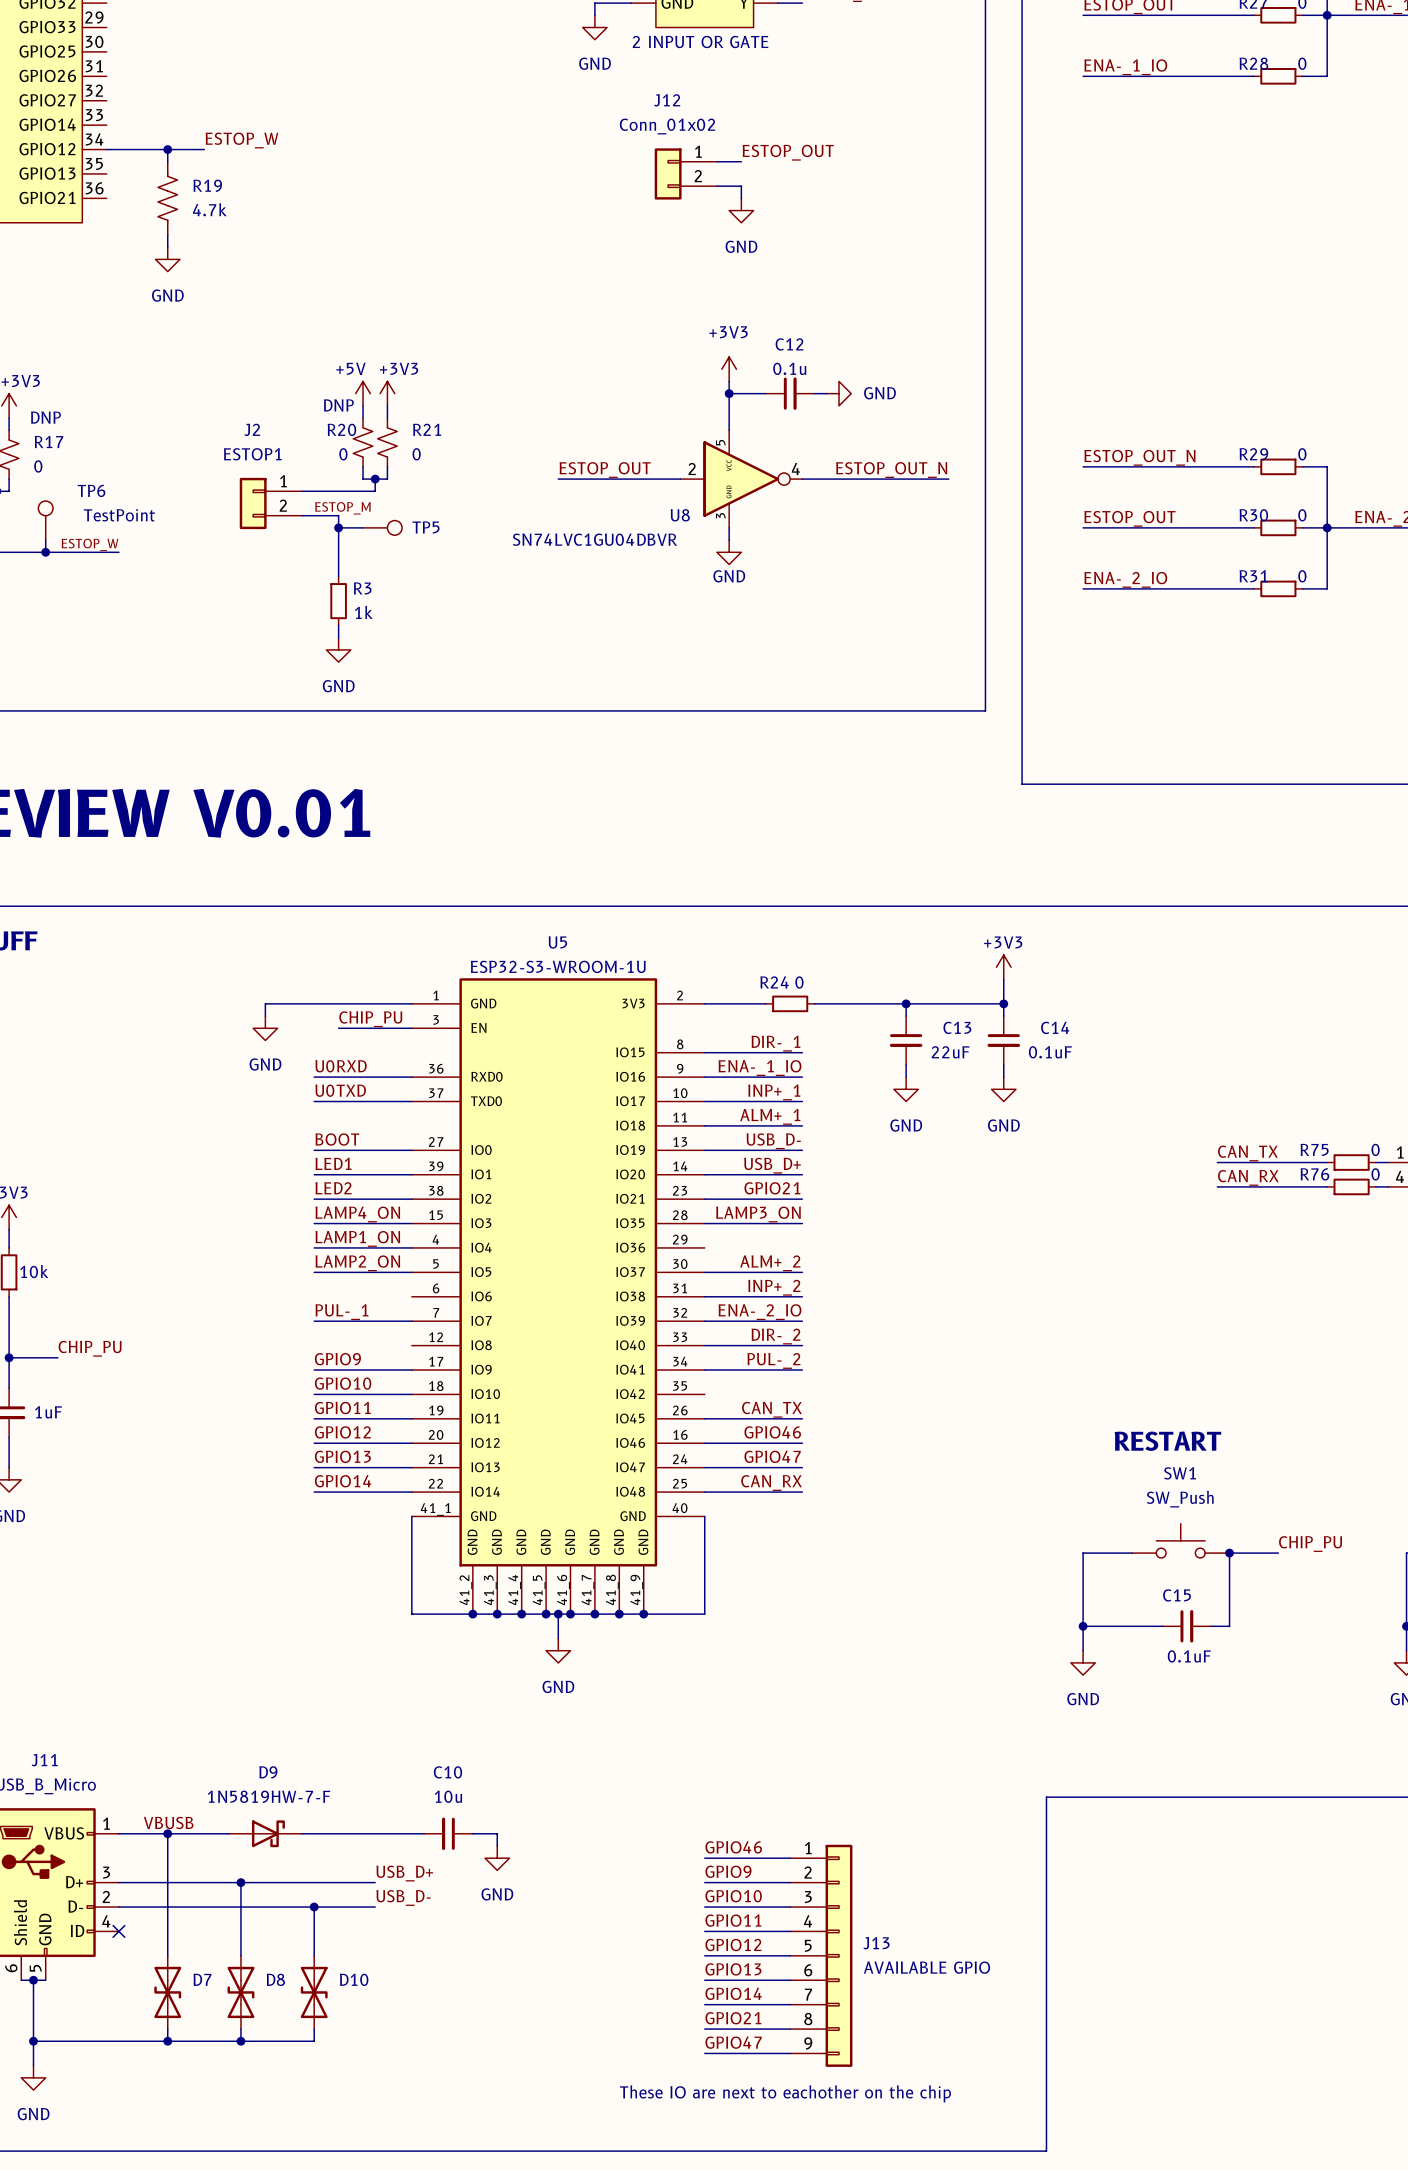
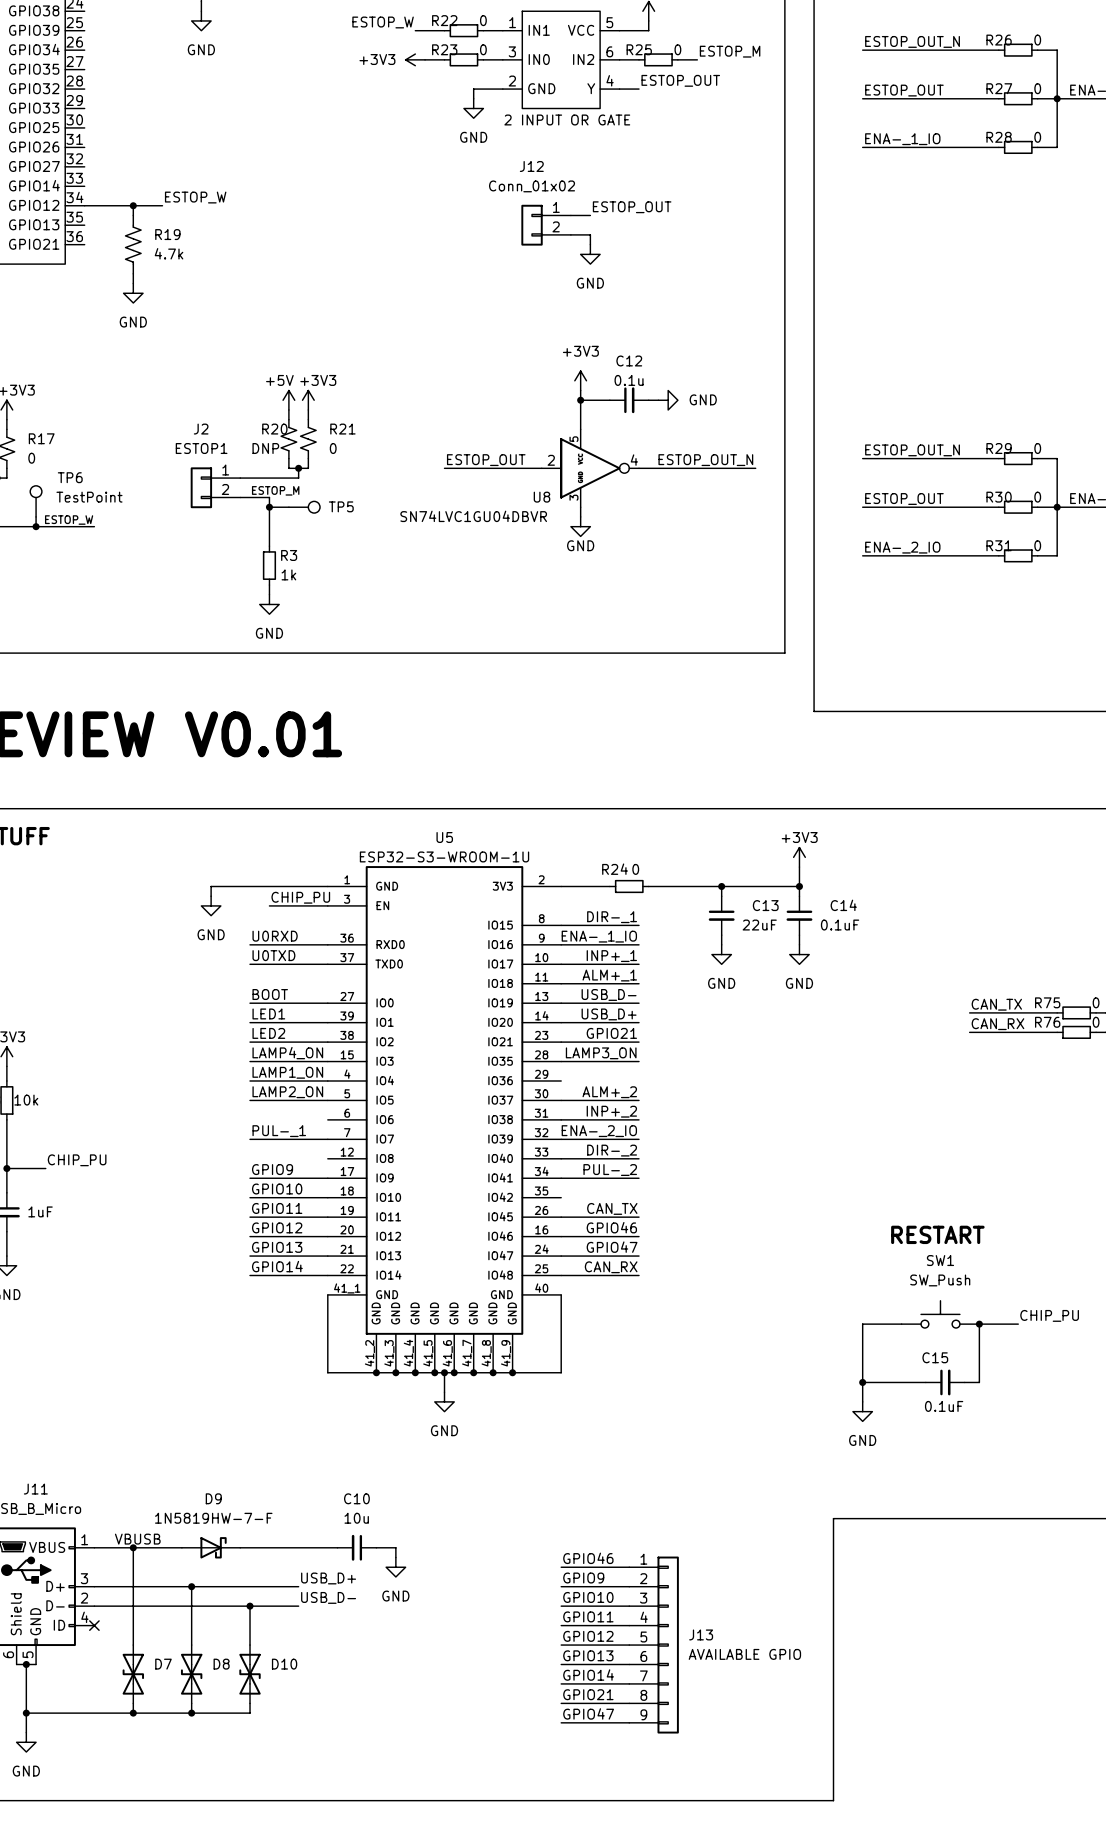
R20 text: DNP (338, 405) -> none
R17 text: DNP (45, 417) -> none
R20 value: 0 (343, 454) -> DNP (265, 448)
text: These IO are next to eachother on the chip (785, 2093) -> none

